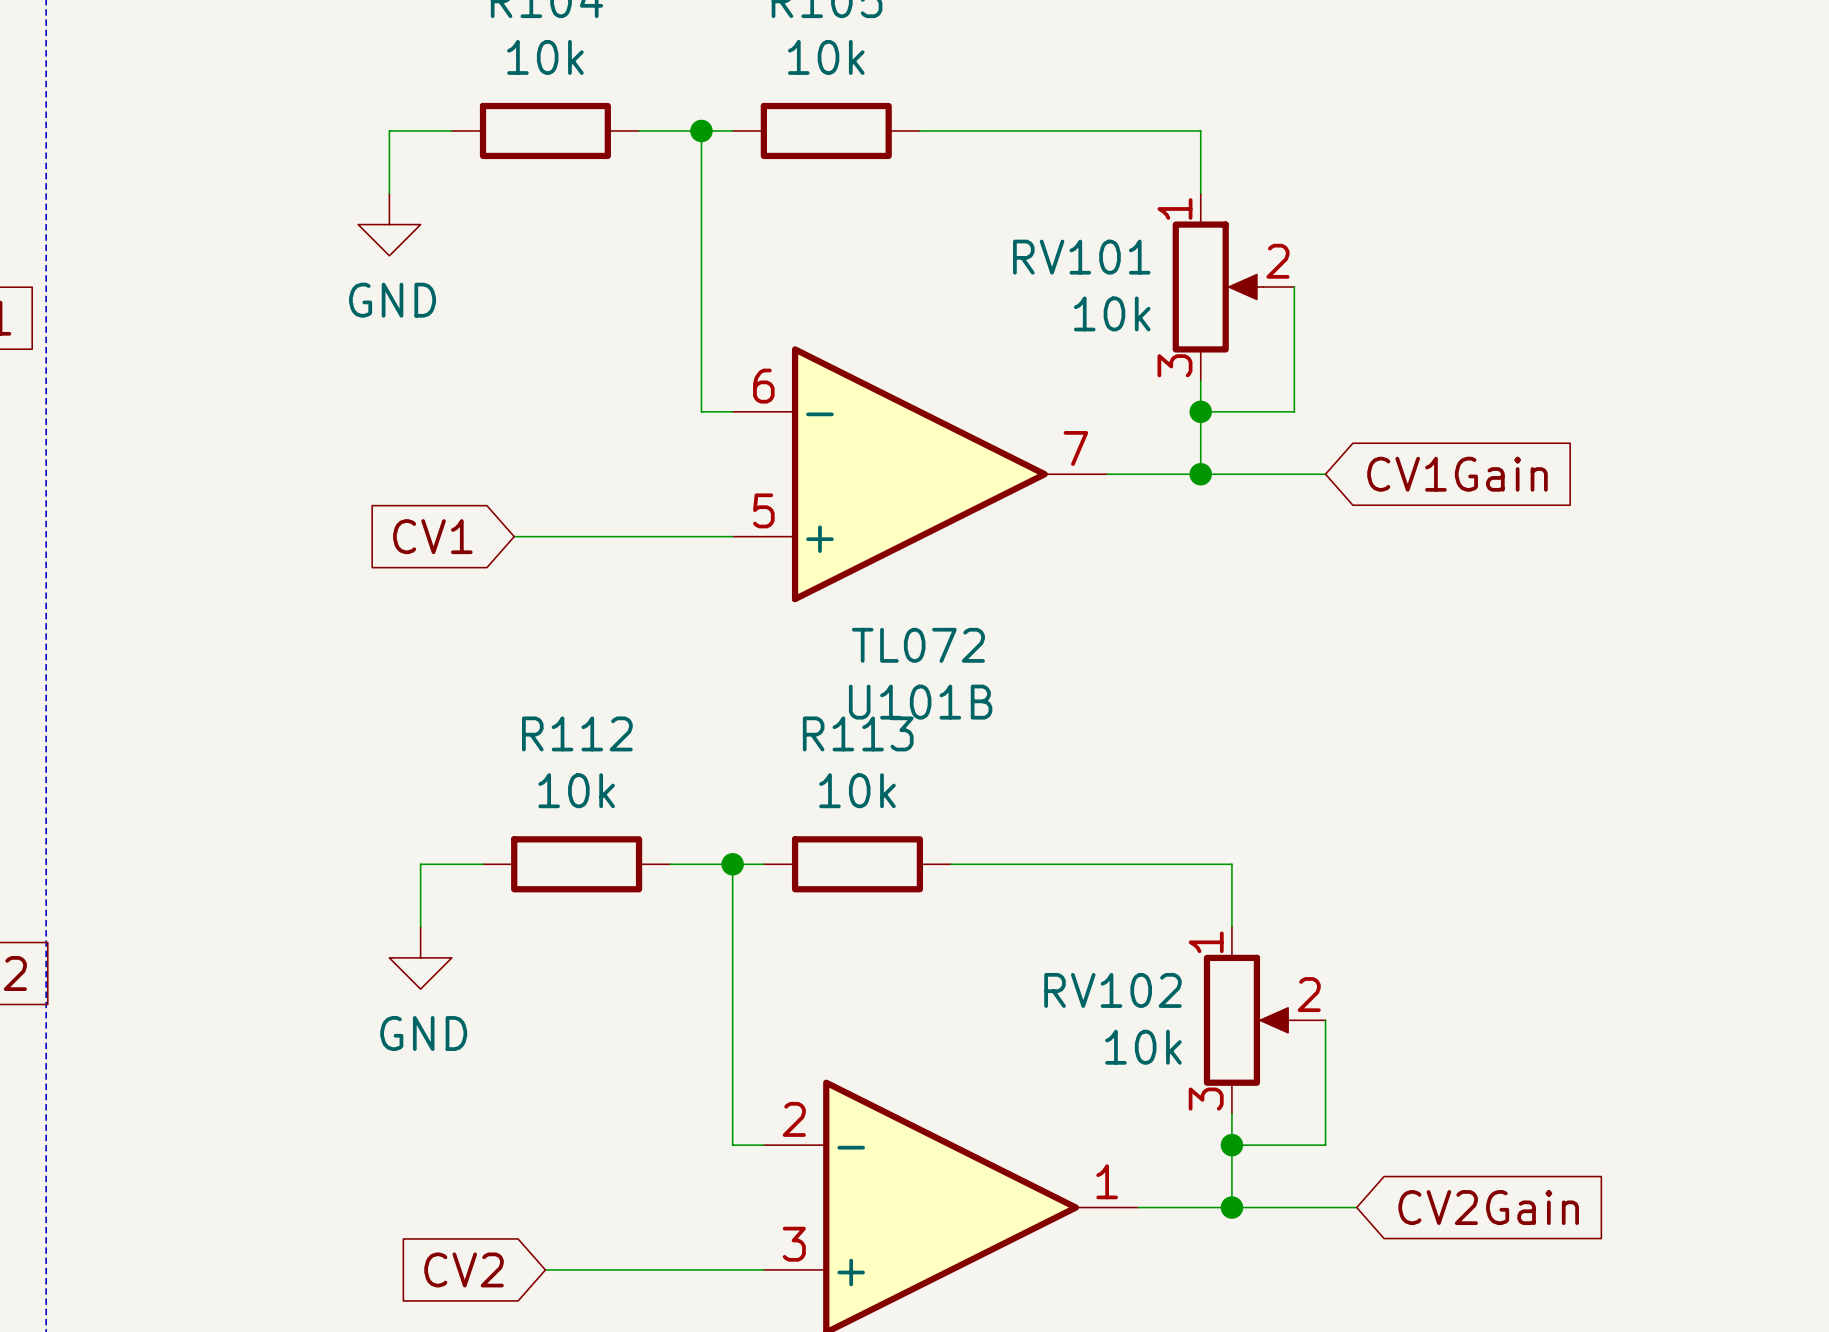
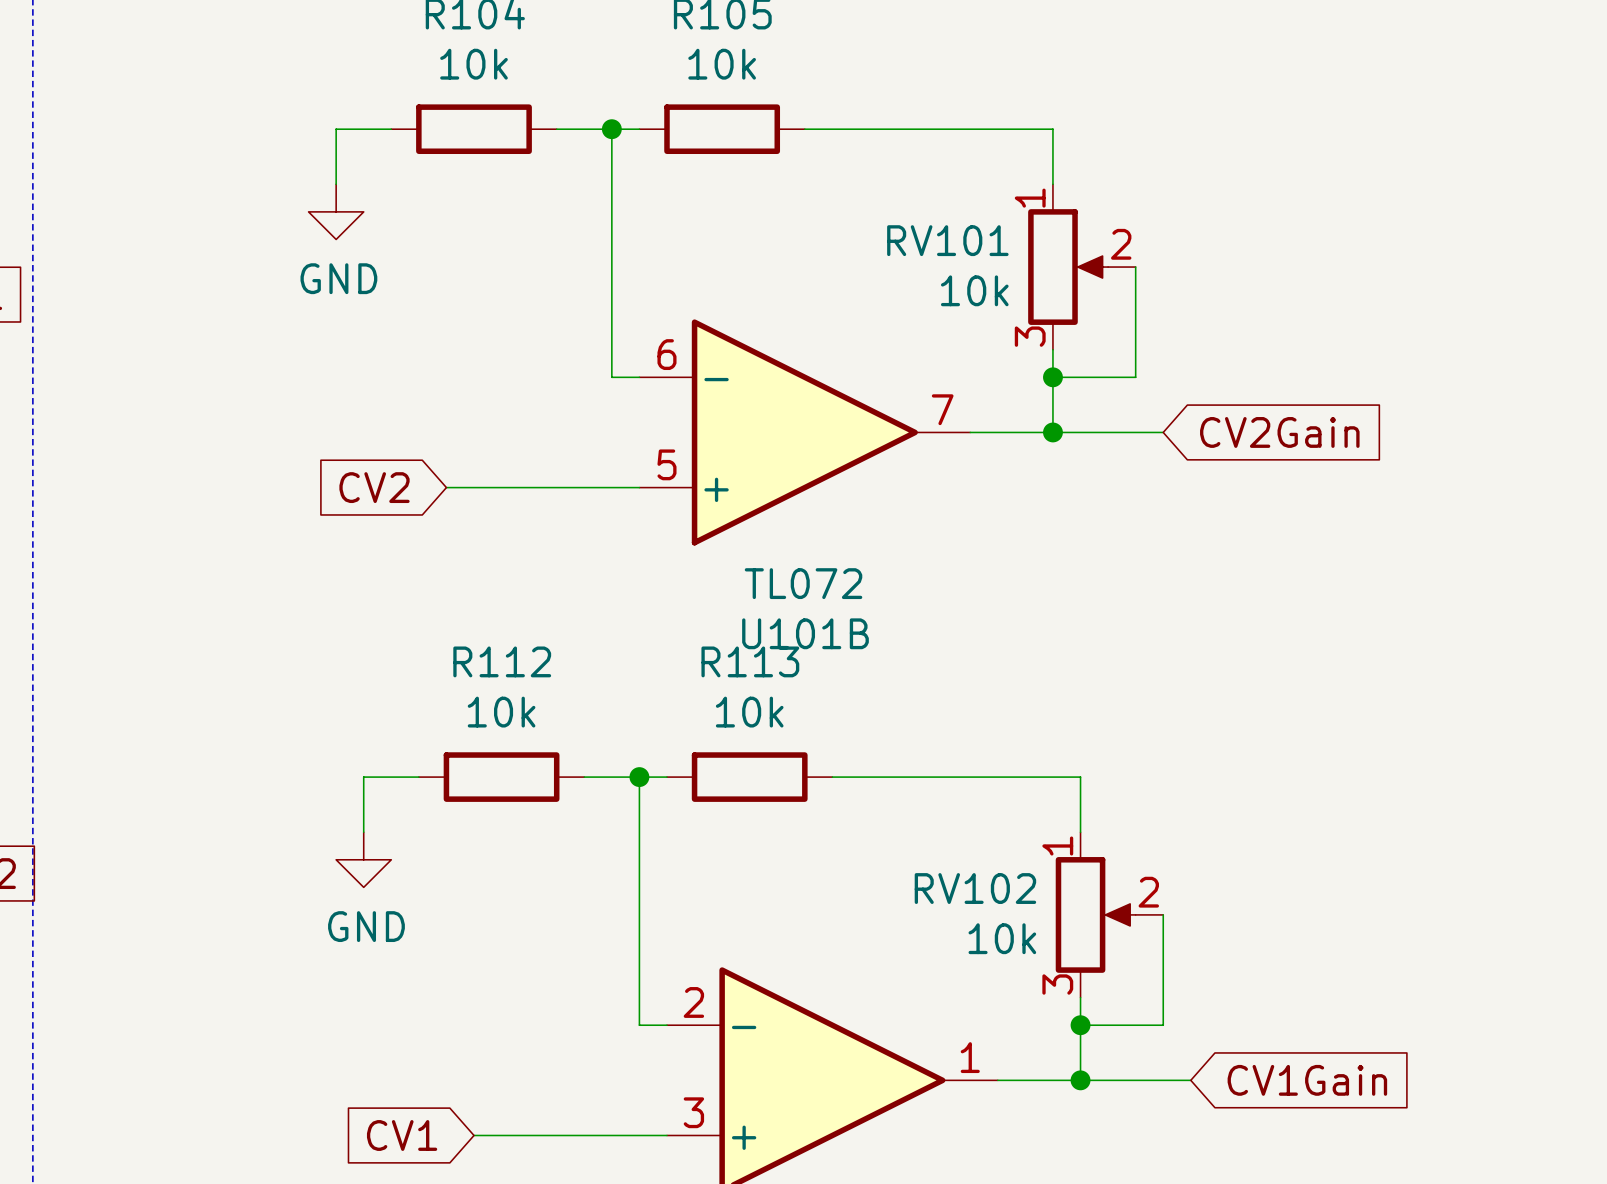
global label: CV1Gain (1457, 474) -> CV2Gain (1279, 432)
global label: CV1 (432, 536) -> CV2 (374, 487)
global label: CV2Gain (1488, 1207) -> CV1Gain (1307, 1080)
global label: CV2 (464, 1269) -> CV1 (402, 1135)

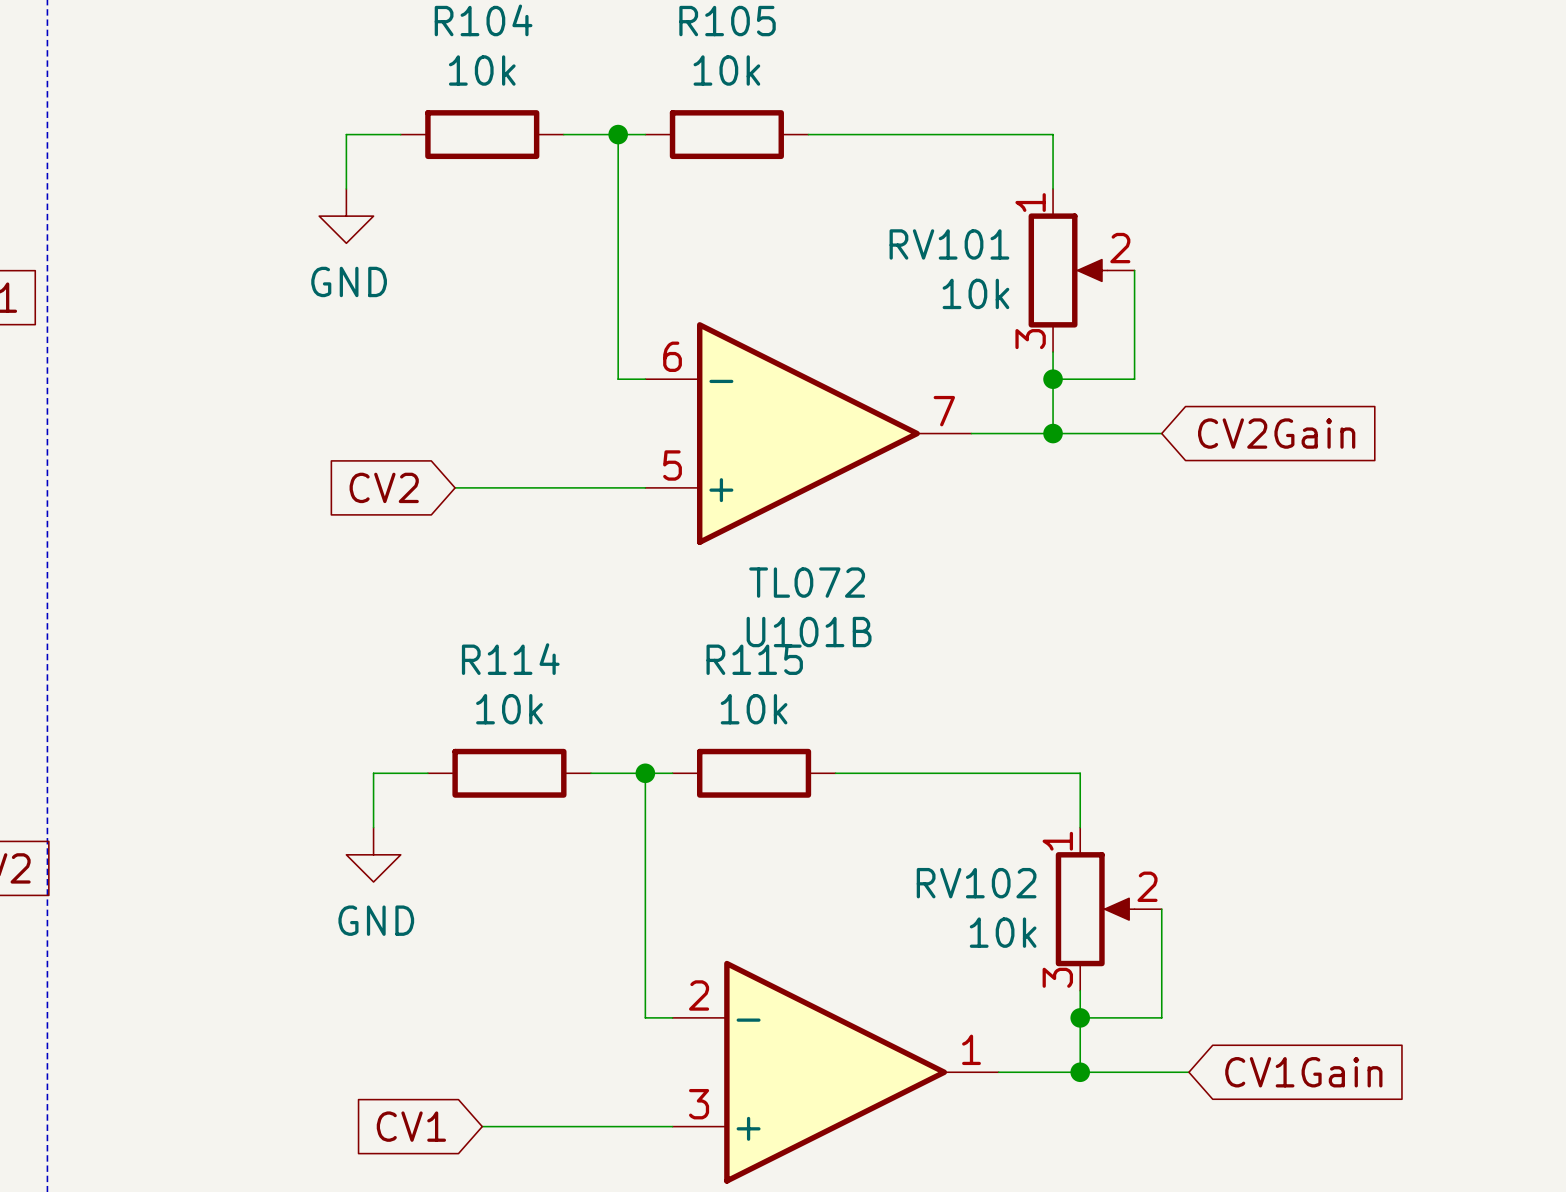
R112 name: R112 (502, 661) -> R114 (510, 659)
R113 name: R113 (750, 661) -> R115 (754, 659)

